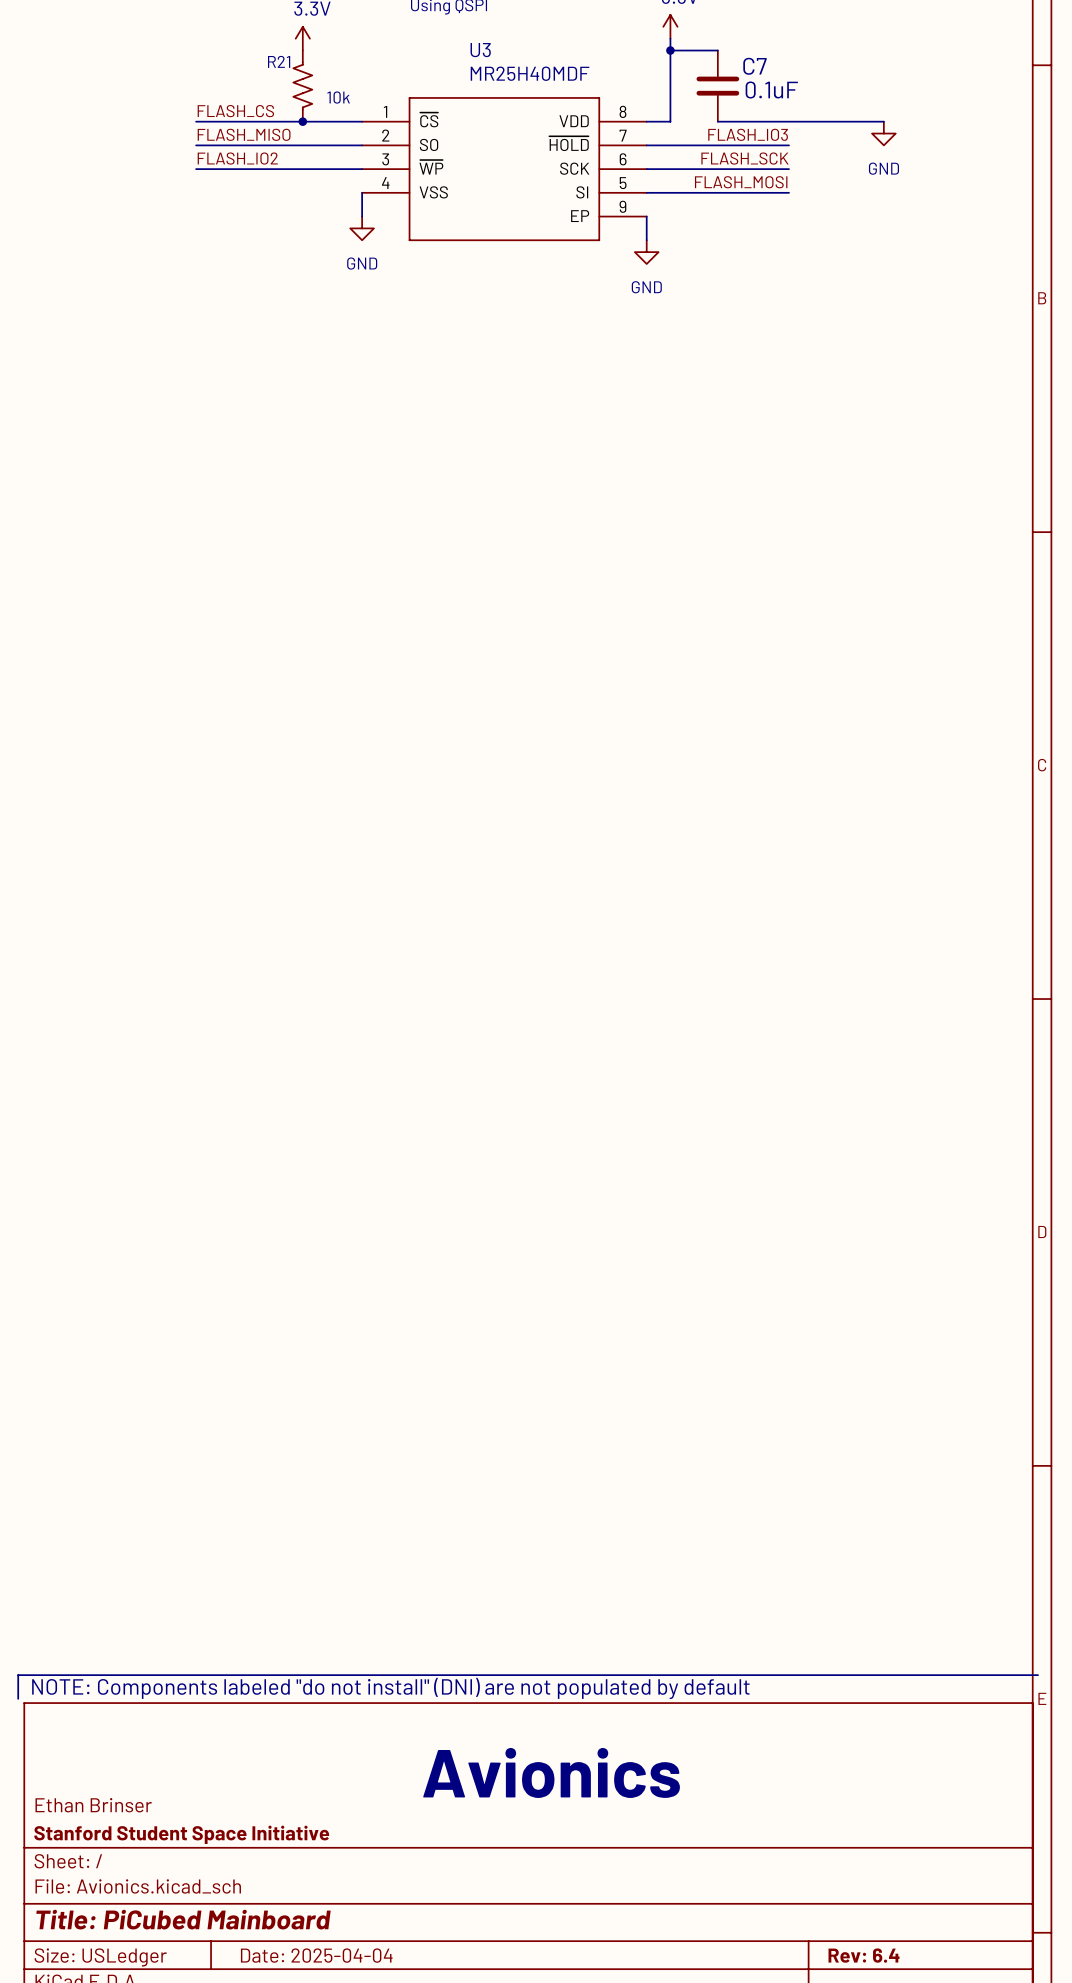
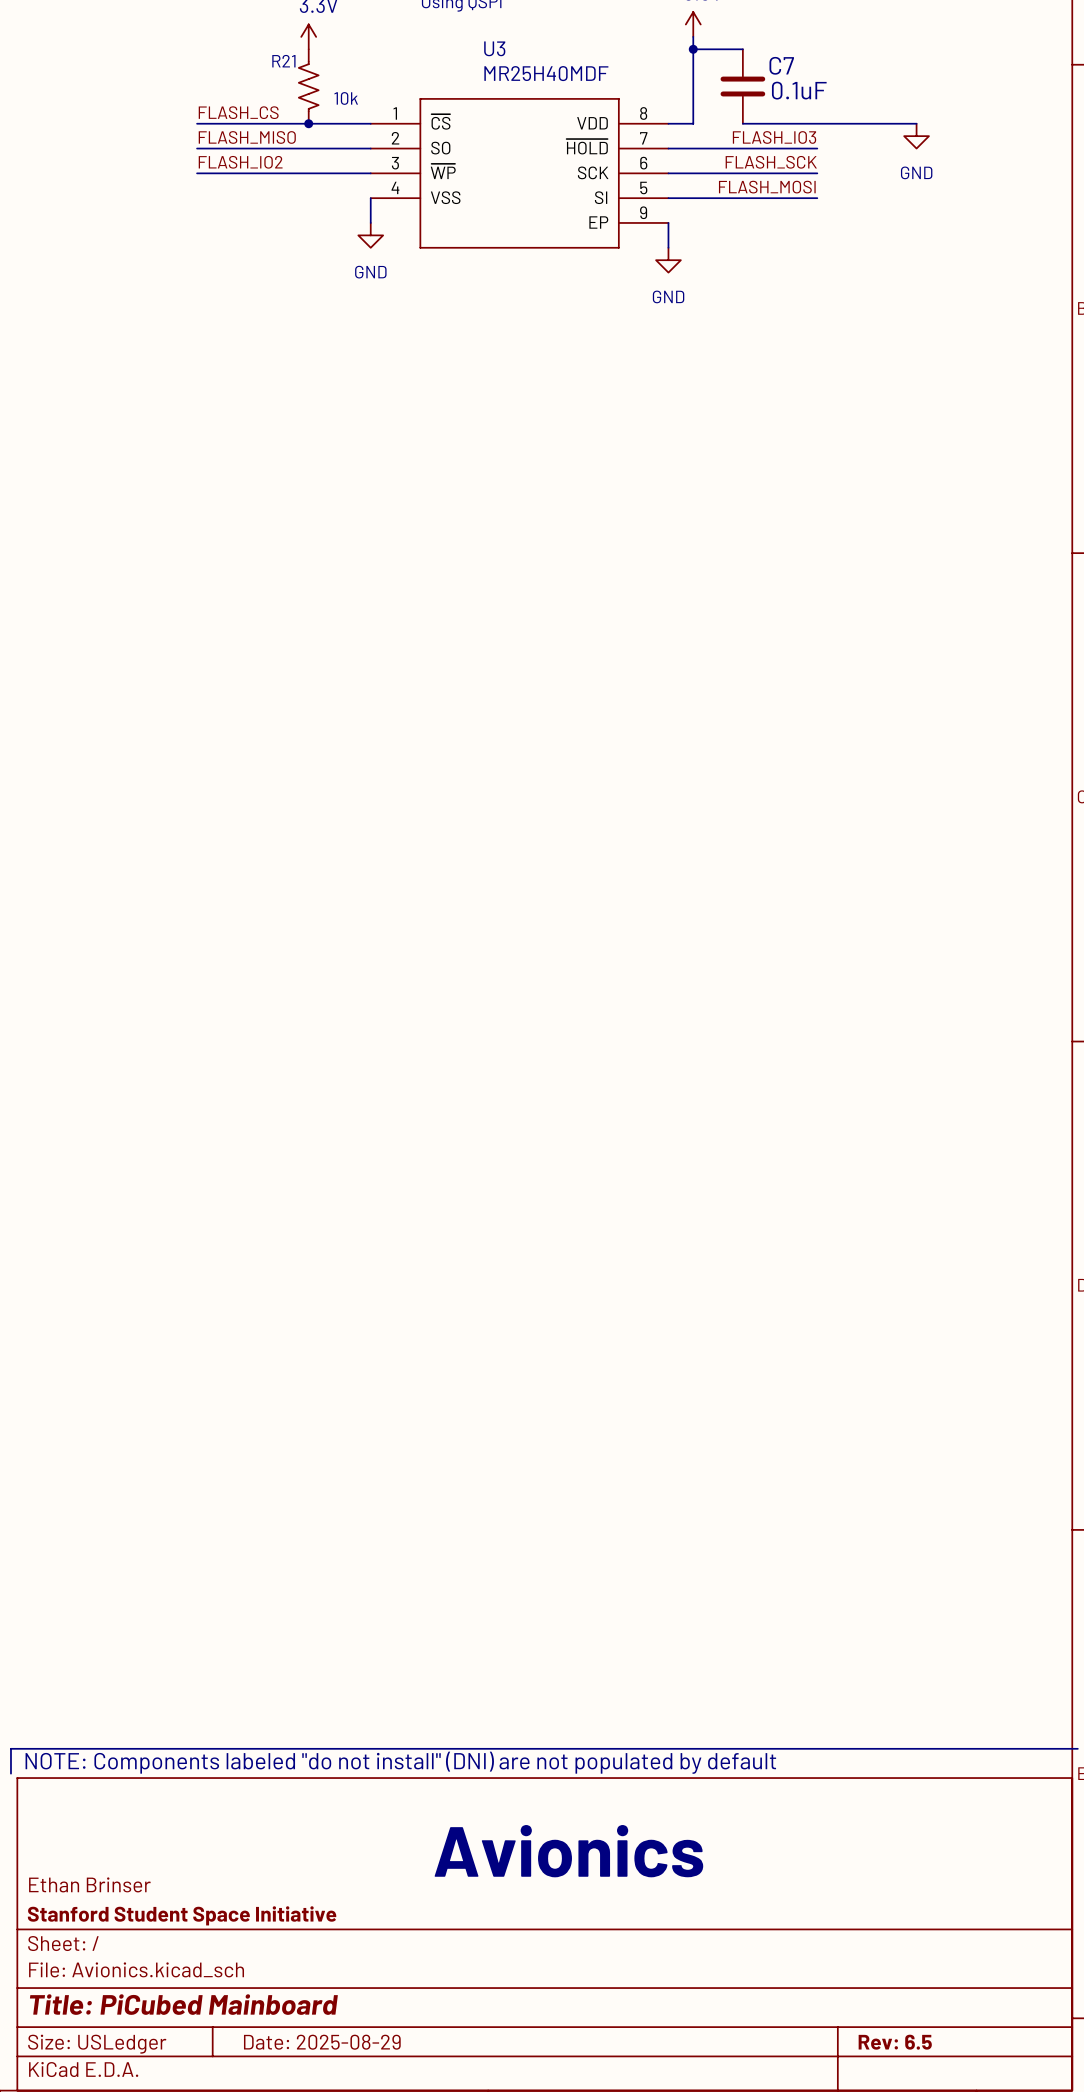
title block: Date: 2025-04-04 (316, 1955) -> Date: 2025-08-29 (322, 2042)
title block: Rev: 6.4 (864, 1955) -> Rev: 6.5 (895, 2042)

